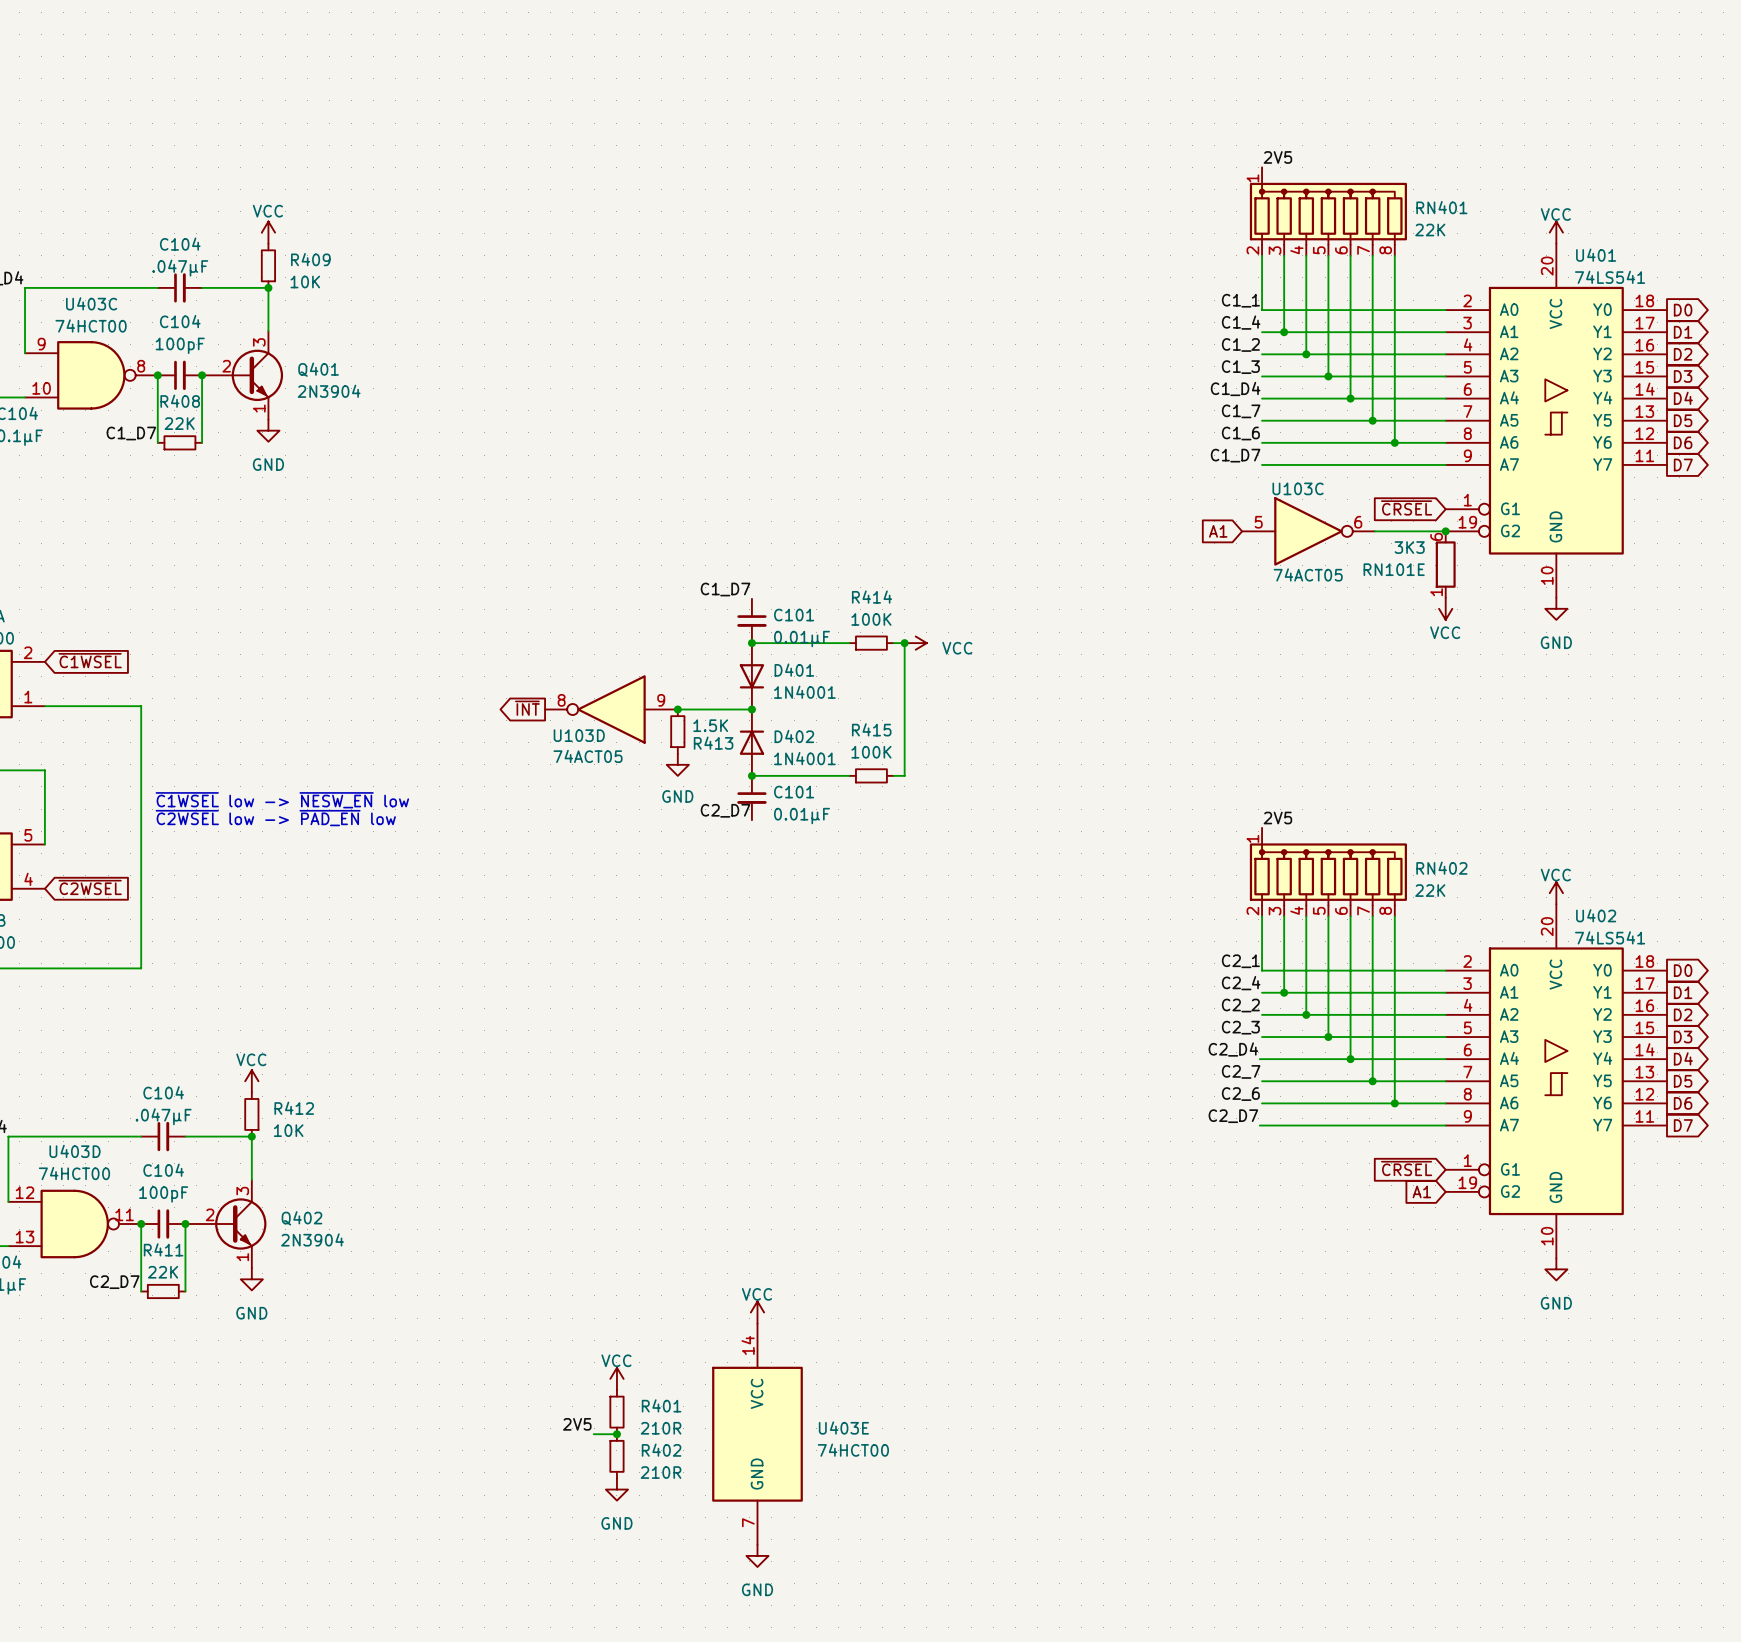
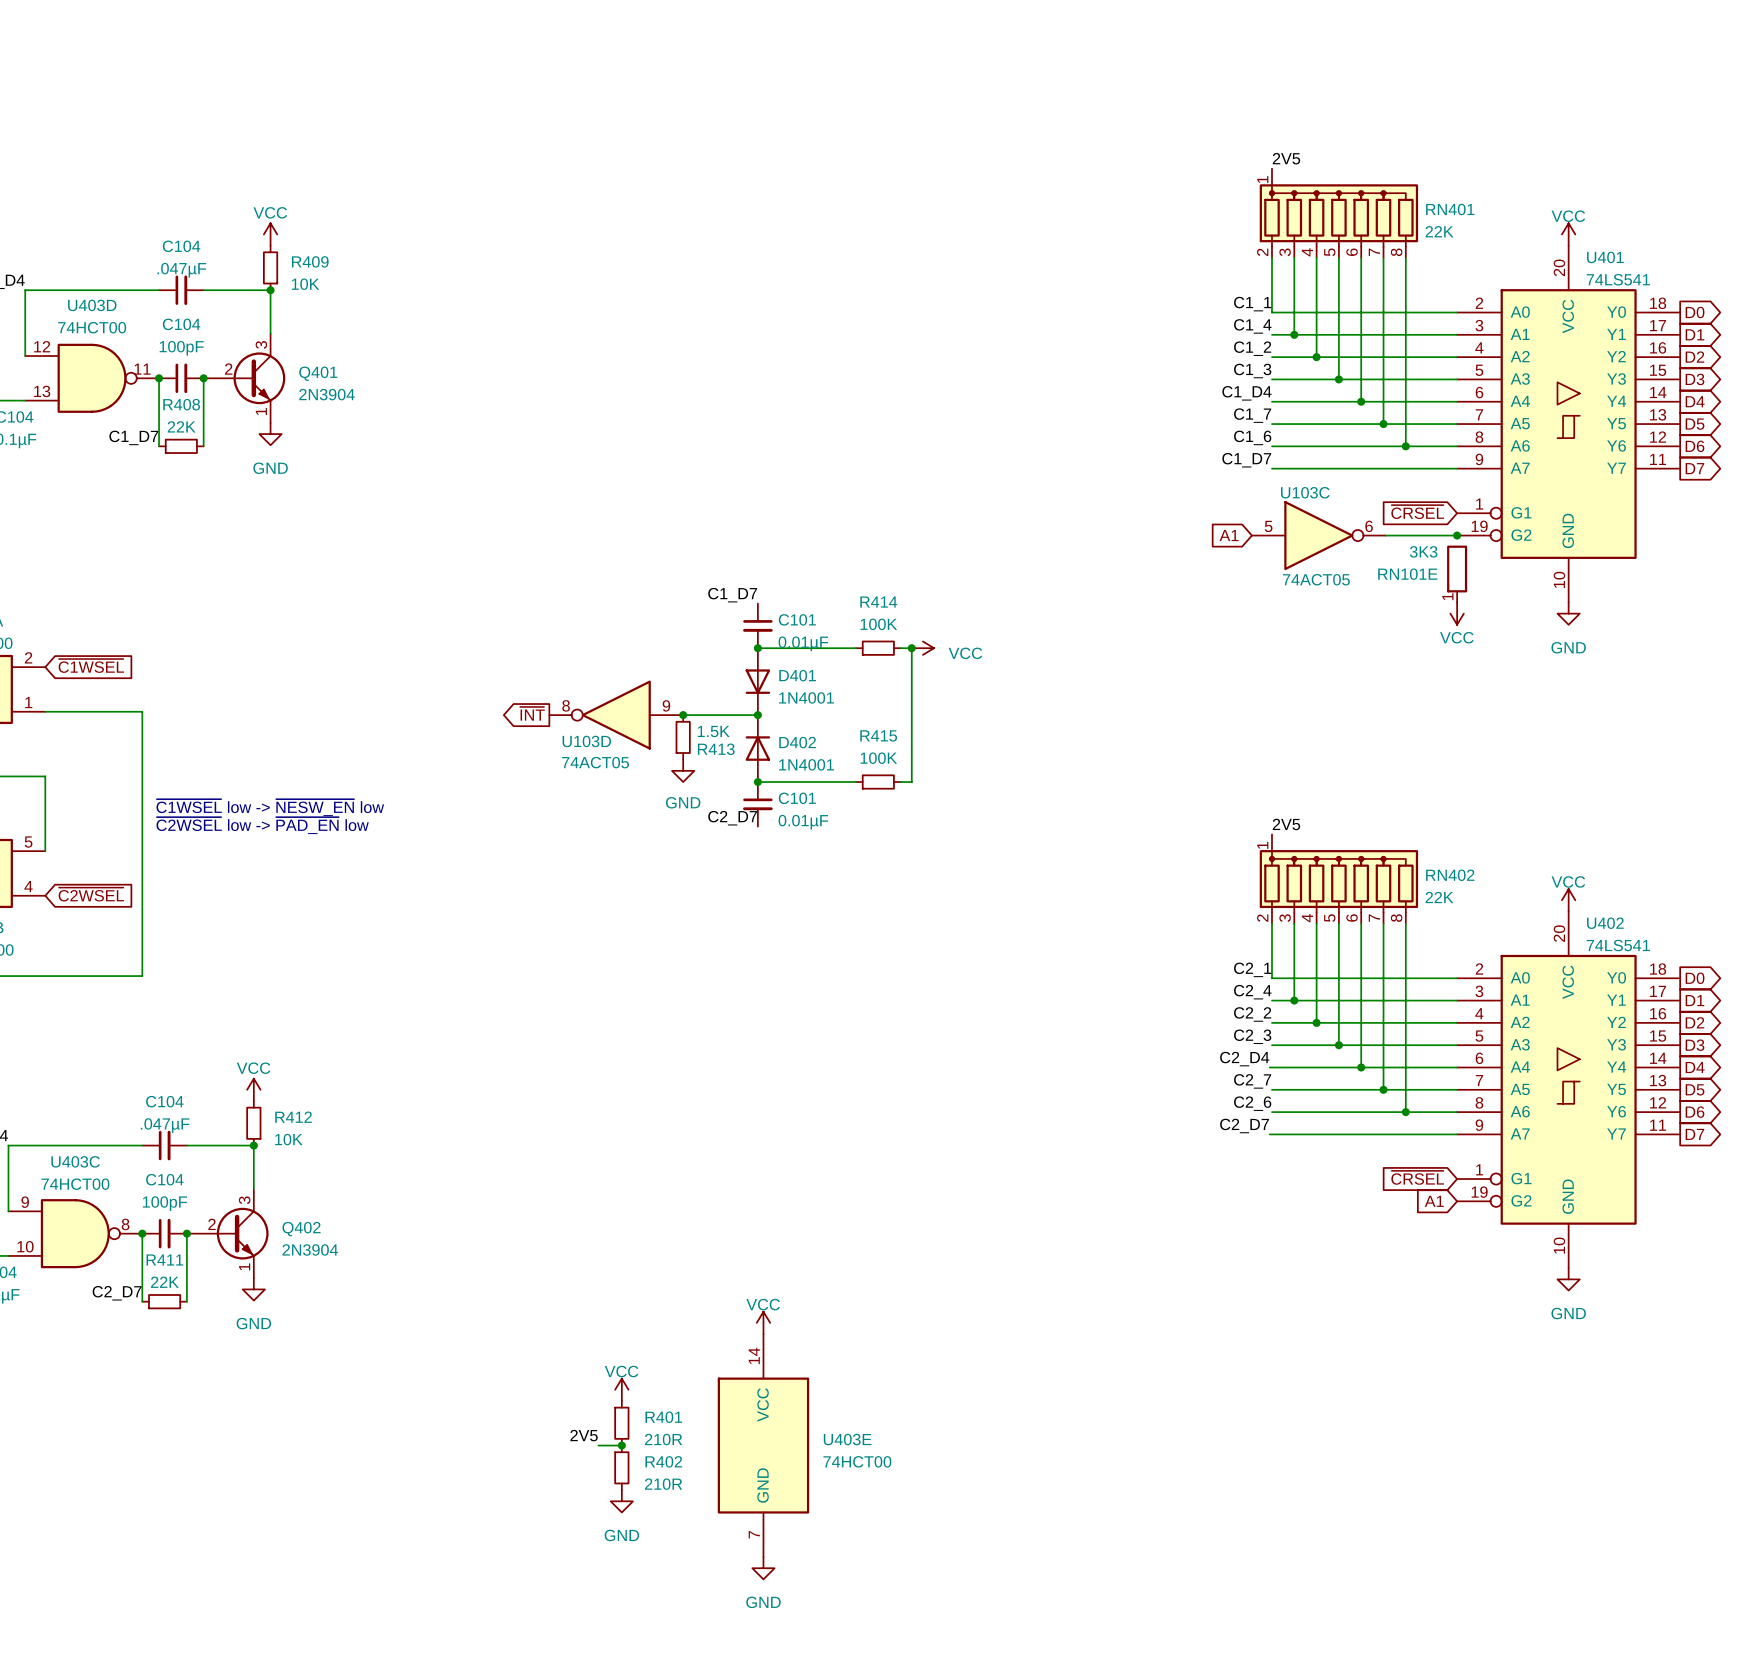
U403C position: (91, 375) -> (75, 1233)
RN101E symbol: [1435, 531, 1456, 598] -> [1447, 545, 1468, 603]
U403D position: (74, 1224) -> (92, 378)

